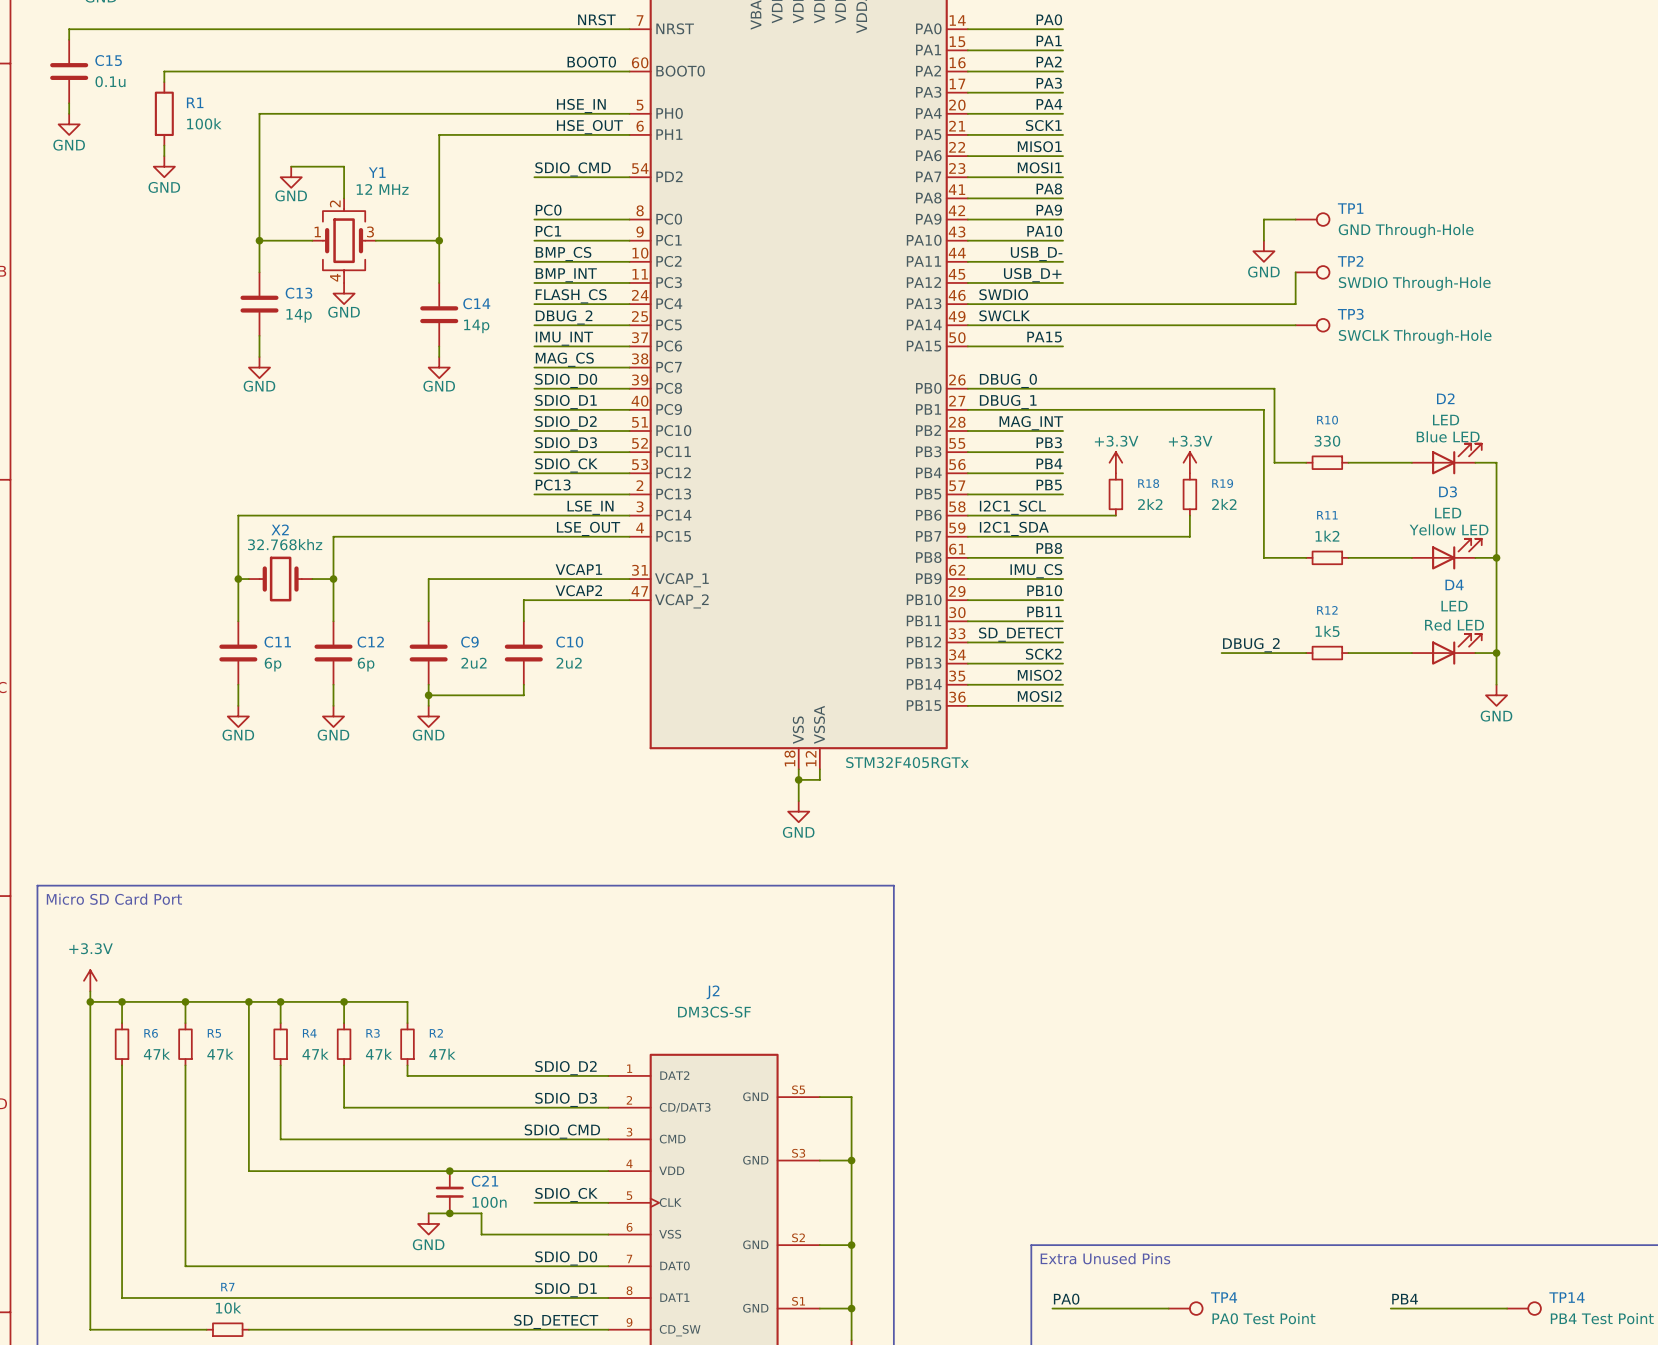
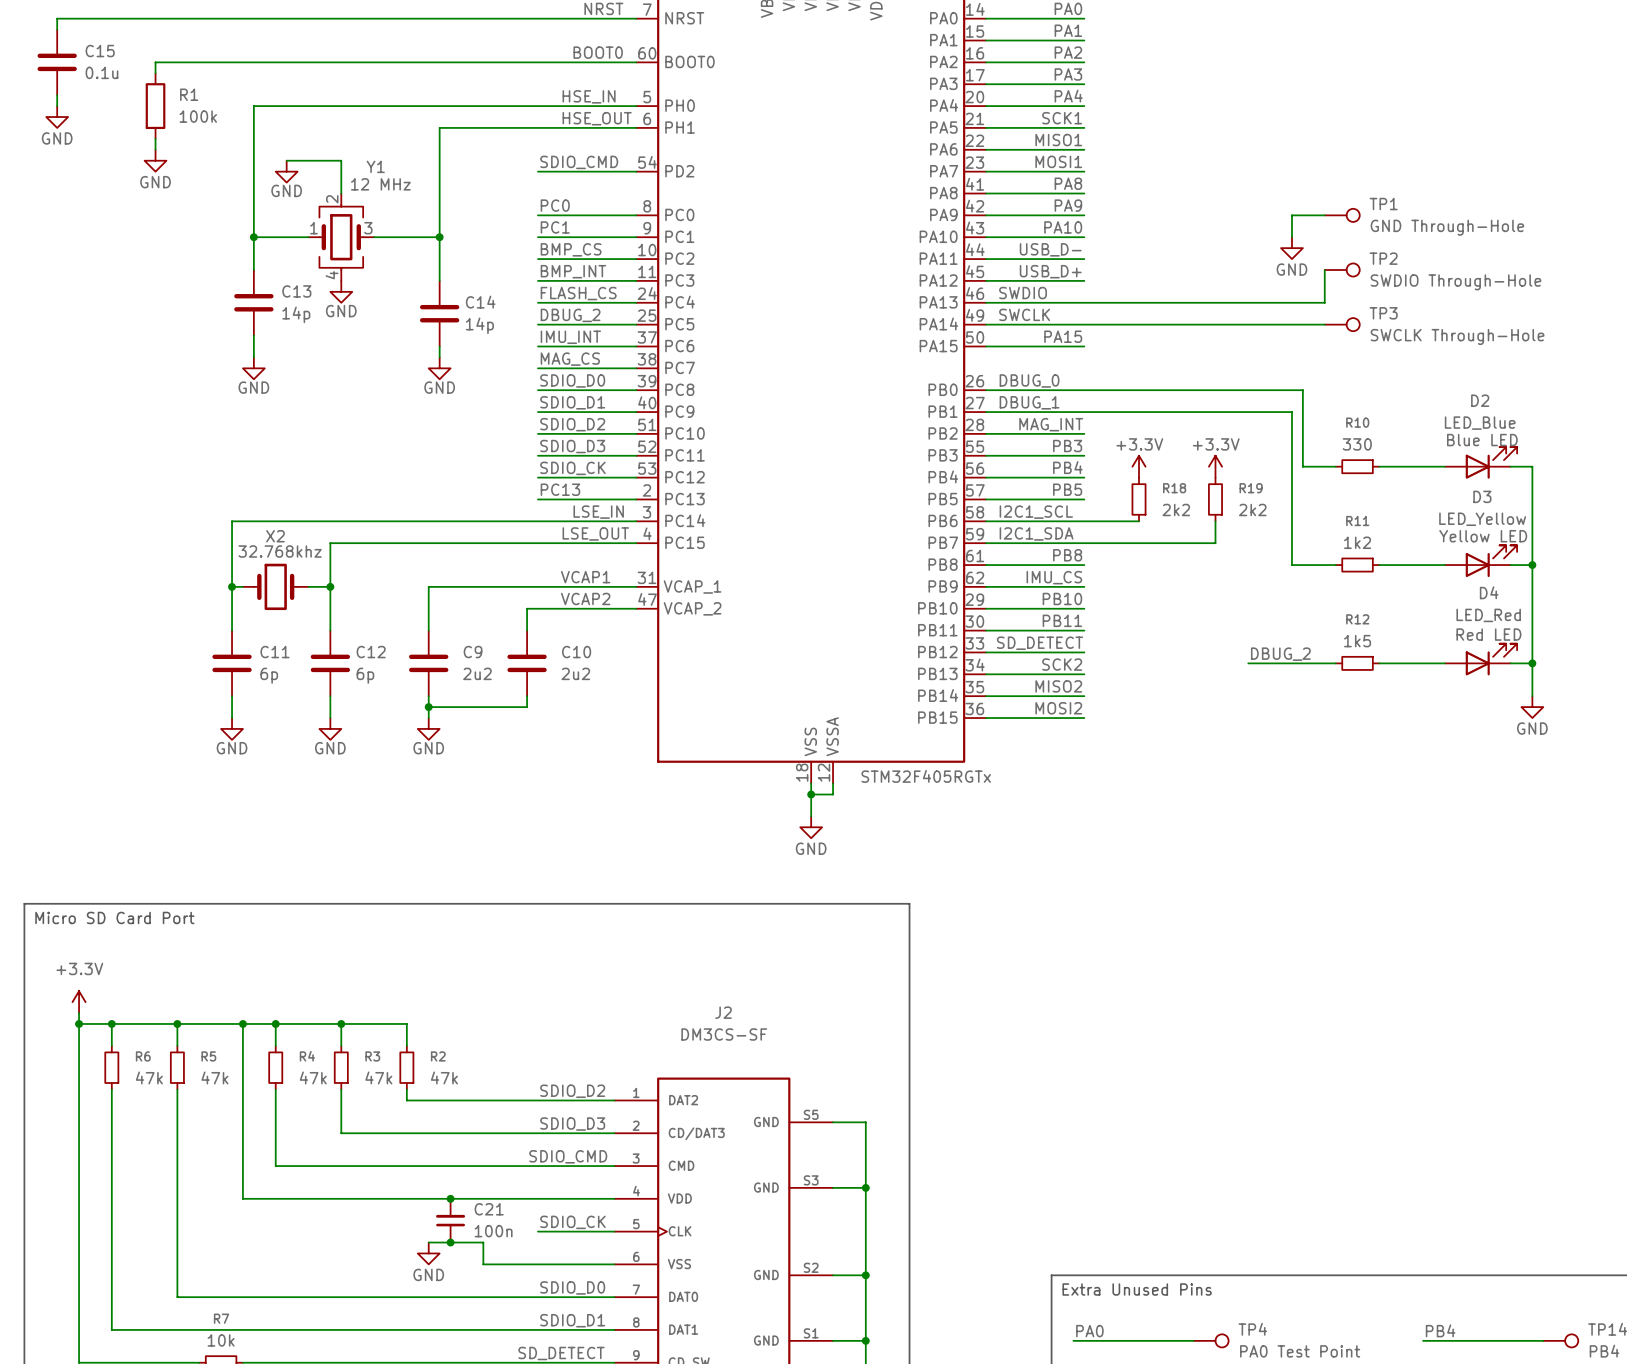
D2 value: LED (1446, 420) -> LED_Blue (1480, 423)
D3 value: LED (1448, 513) -> LED_Yellow (1482, 519)
D4 value: LED (1454, 606) -> LED_Red (1488, 615)

